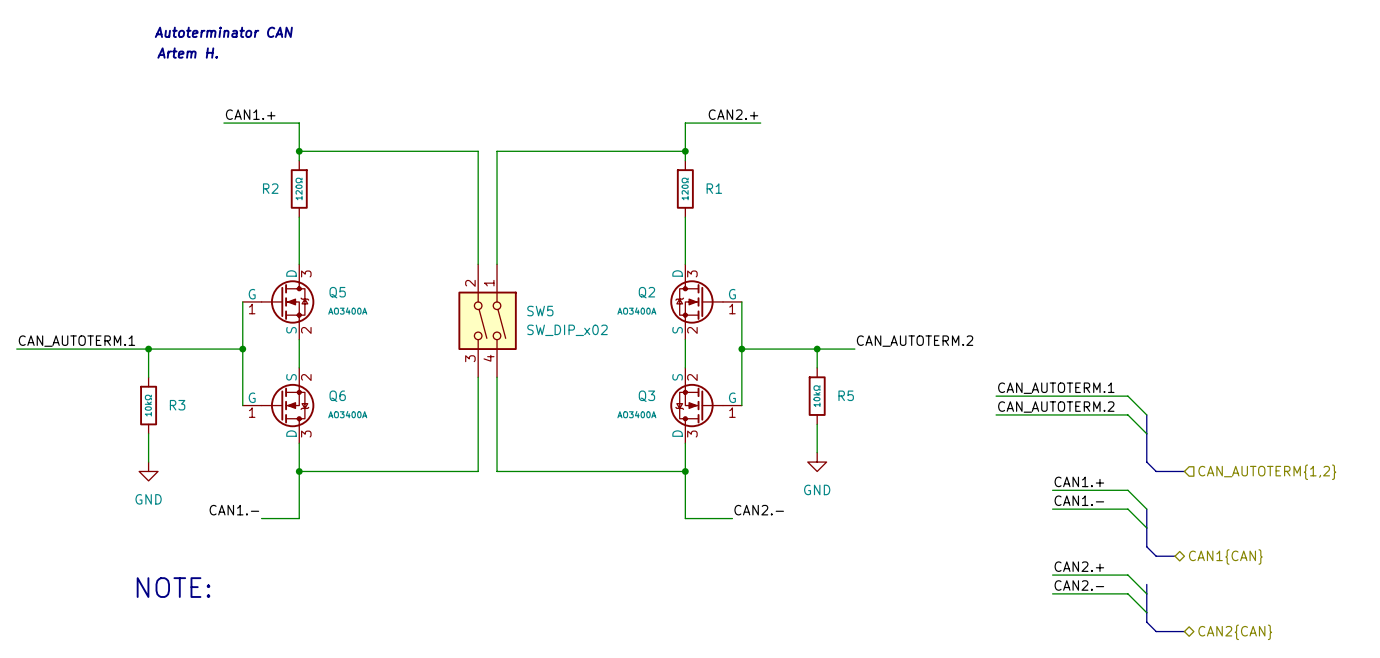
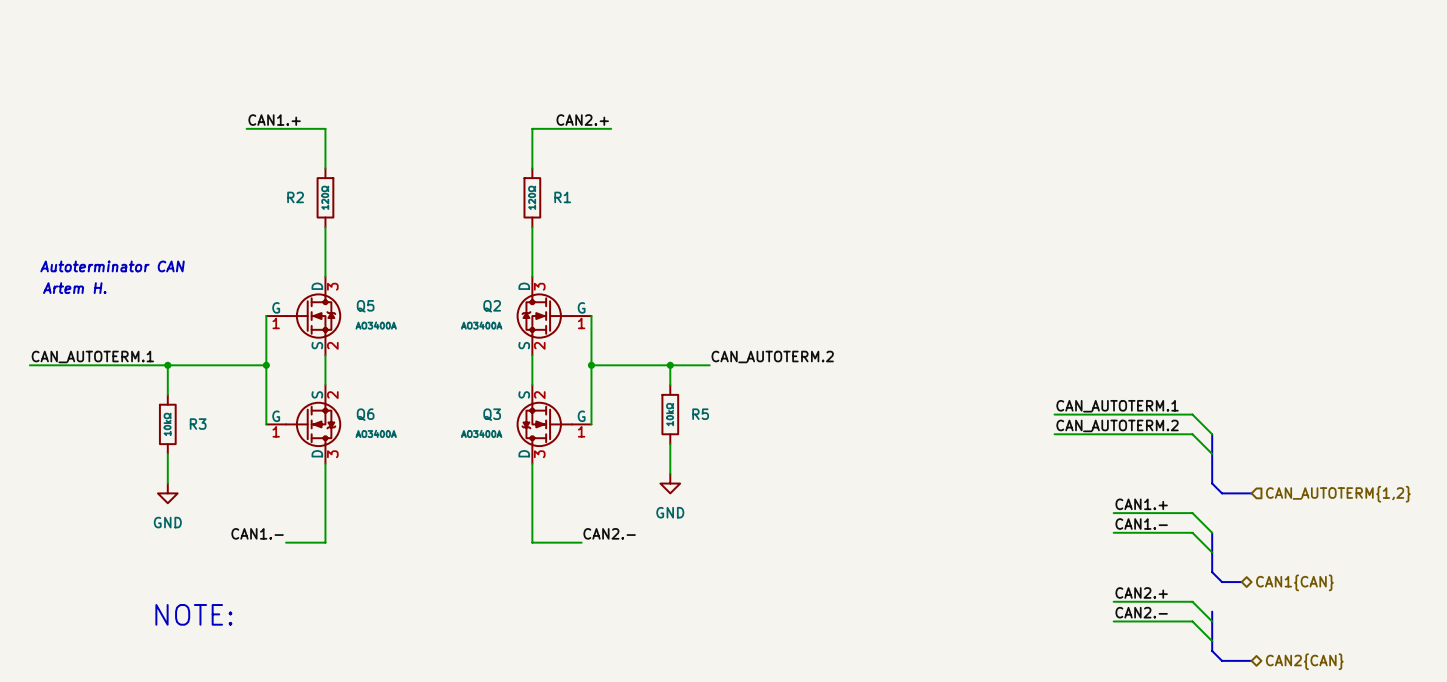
text: Autoterminator CAN (223, 32) -> none
text: Artem H. (187, 53) -> none
label: none -> CAN2.+ (582, 120)
label: CAN2.+ (733, 114) -> none
wire: (760, 123) (685, 123) (685, 160) -> none
wire: (299, 151) (478, 151) (478, 264) -> none
junction: (299, 151) -> none
wire: (497, 151) (685, 151) -> (532, 158) (532, 128) (611, 128)
junction: (685, 151) -> none
wire: (497, 160) (497, 217) -> none
R1 position: (685, 188) -> (532, 197)
wire: (685, 217) (685, 264) -> none
text: none -> Autoterminator CAN (112, 266)
text: none -> Artem H. (74, 288)
wire: none -> (591, 316) (591, 424)
Q2 position: (706, 301) -> (554, 316)
wire: (741, 301) (741, 405) -> none
SW5: SW_DIP_x02 (487, 320) -> none
wire: (685, 339) (685, 367) -> (670, 444) (670, 473)
label: none -> CAN_AUTOTERM.2 (772, 356)
label: CAN_AUTOTERM.2 (915, 341) -> none
wire: none -> (591, 365) (709, 365)
junction: none -> (591, 365)
wire: none -> (670, 365) (670, 385)
junction: none -> (670, 365)
wire: (741, 349) (854, 349) -> none
junction: (741, 349) -> none
wire: (817, 349) (817, 367) -> none
junction: (817, 349) -> none
wire: (478, 377) (478, 471) (299, 471) -> none
R5 position: (817, 396) -> (670, 414)
Q3 position: (706, 405) -> (554, 424)
wire: (817, 424) (817, 452) -> none
wire: (685, 443) (685, 518) (732, 518) -> none
power symbol: none -> GND (670, 483)
power symbol: GND (817, 462) -> none
junction: (299, 471) -> none
wire: (497, 471) (685, 471) -> (532, 493) (532, 542) (581, 542)
junction: (685, 471) -> none
label: none -> CAN2.- (609, 533)
label: CAN2.- (759, 510) -> none

